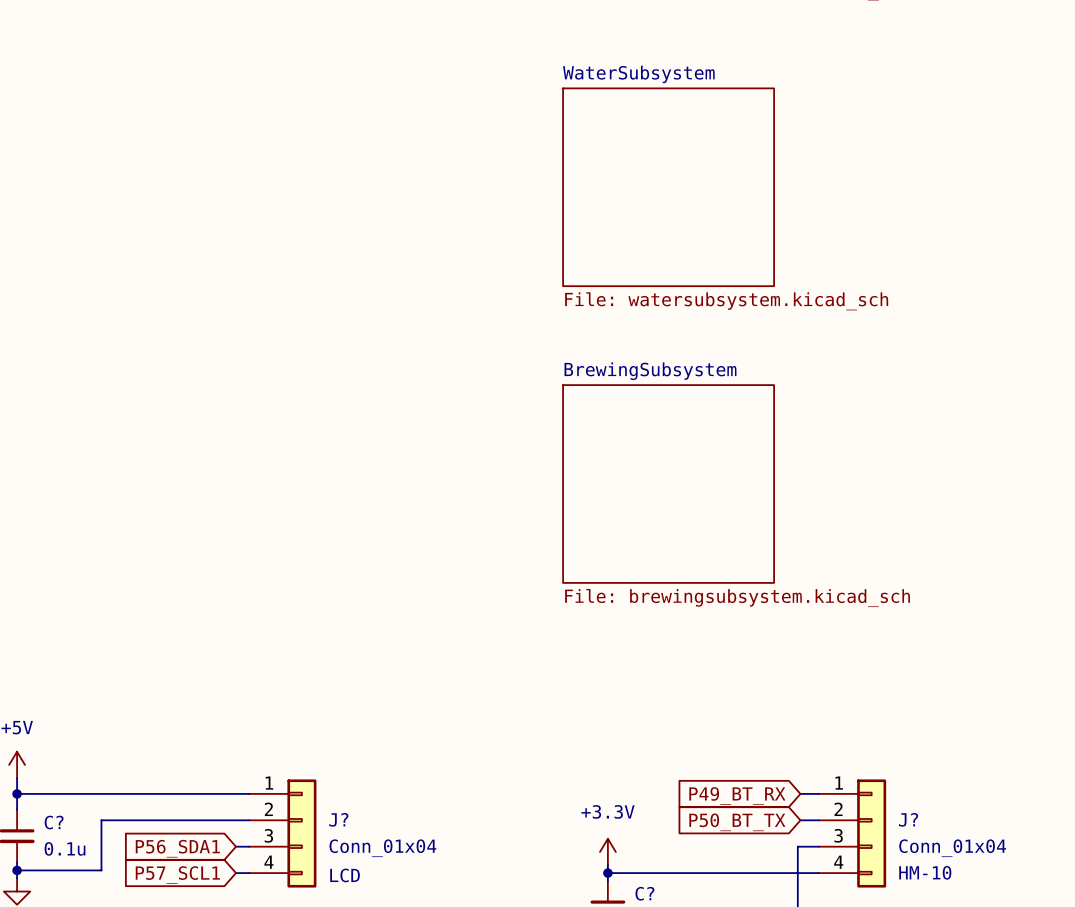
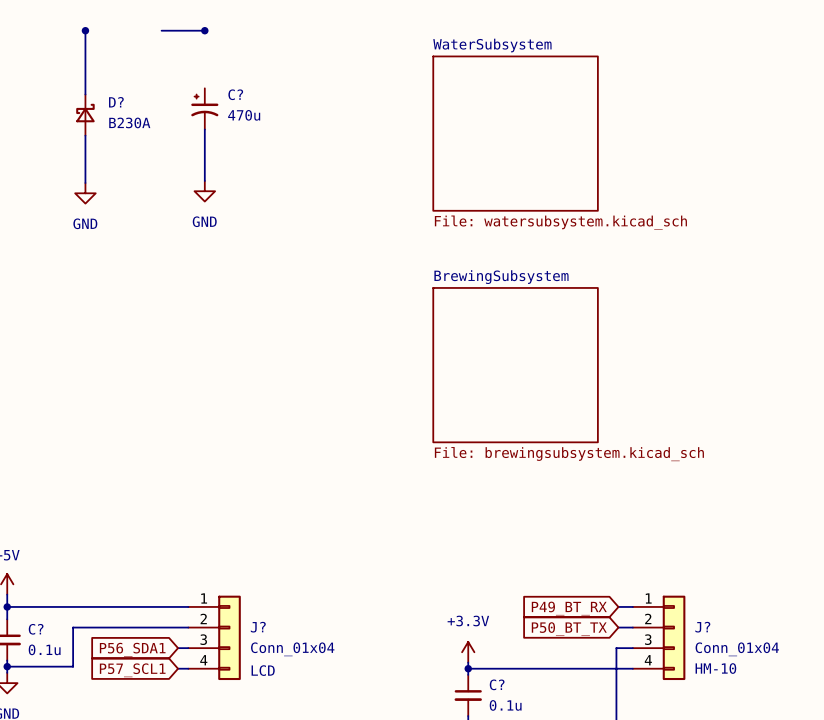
wire: none -> (85, 30) (85, 94)
junction: none -> (85, 30)
wire: none -> (161, 30) (204, 30)
junction: none -> (204, 30)
C?: none -> 470u (204, 108)
D?: none -> B230A (85, 115)
wire: none -> (204, 129) (204, 180)
wire: none -> (85, 135) (85, 183)
power symbol: none -> GND (204, 191)
power symbol: none -> GND (85, 193)

